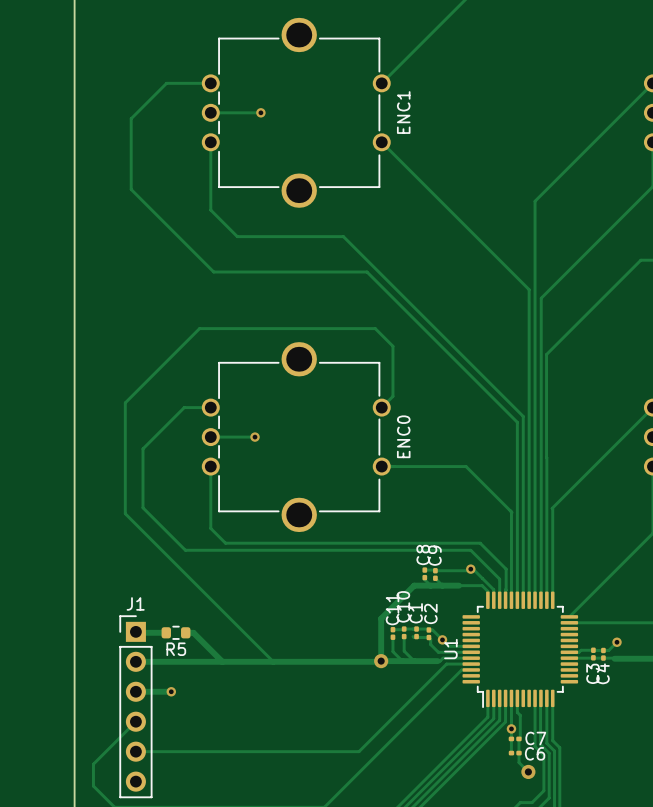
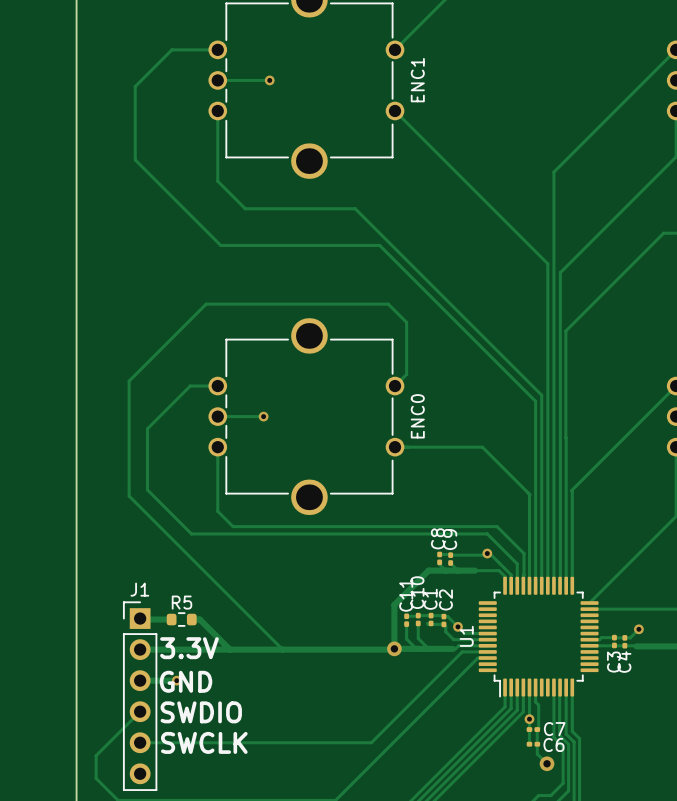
R5 name position: R5 (176, 649) -> R5 (182, 602)
text: none -> 3.3V (189, 648)
text: none -> GND (185, 681)
text: none -> SWDIO (201, 712)
text: none -> SWCLK (204, 742)

